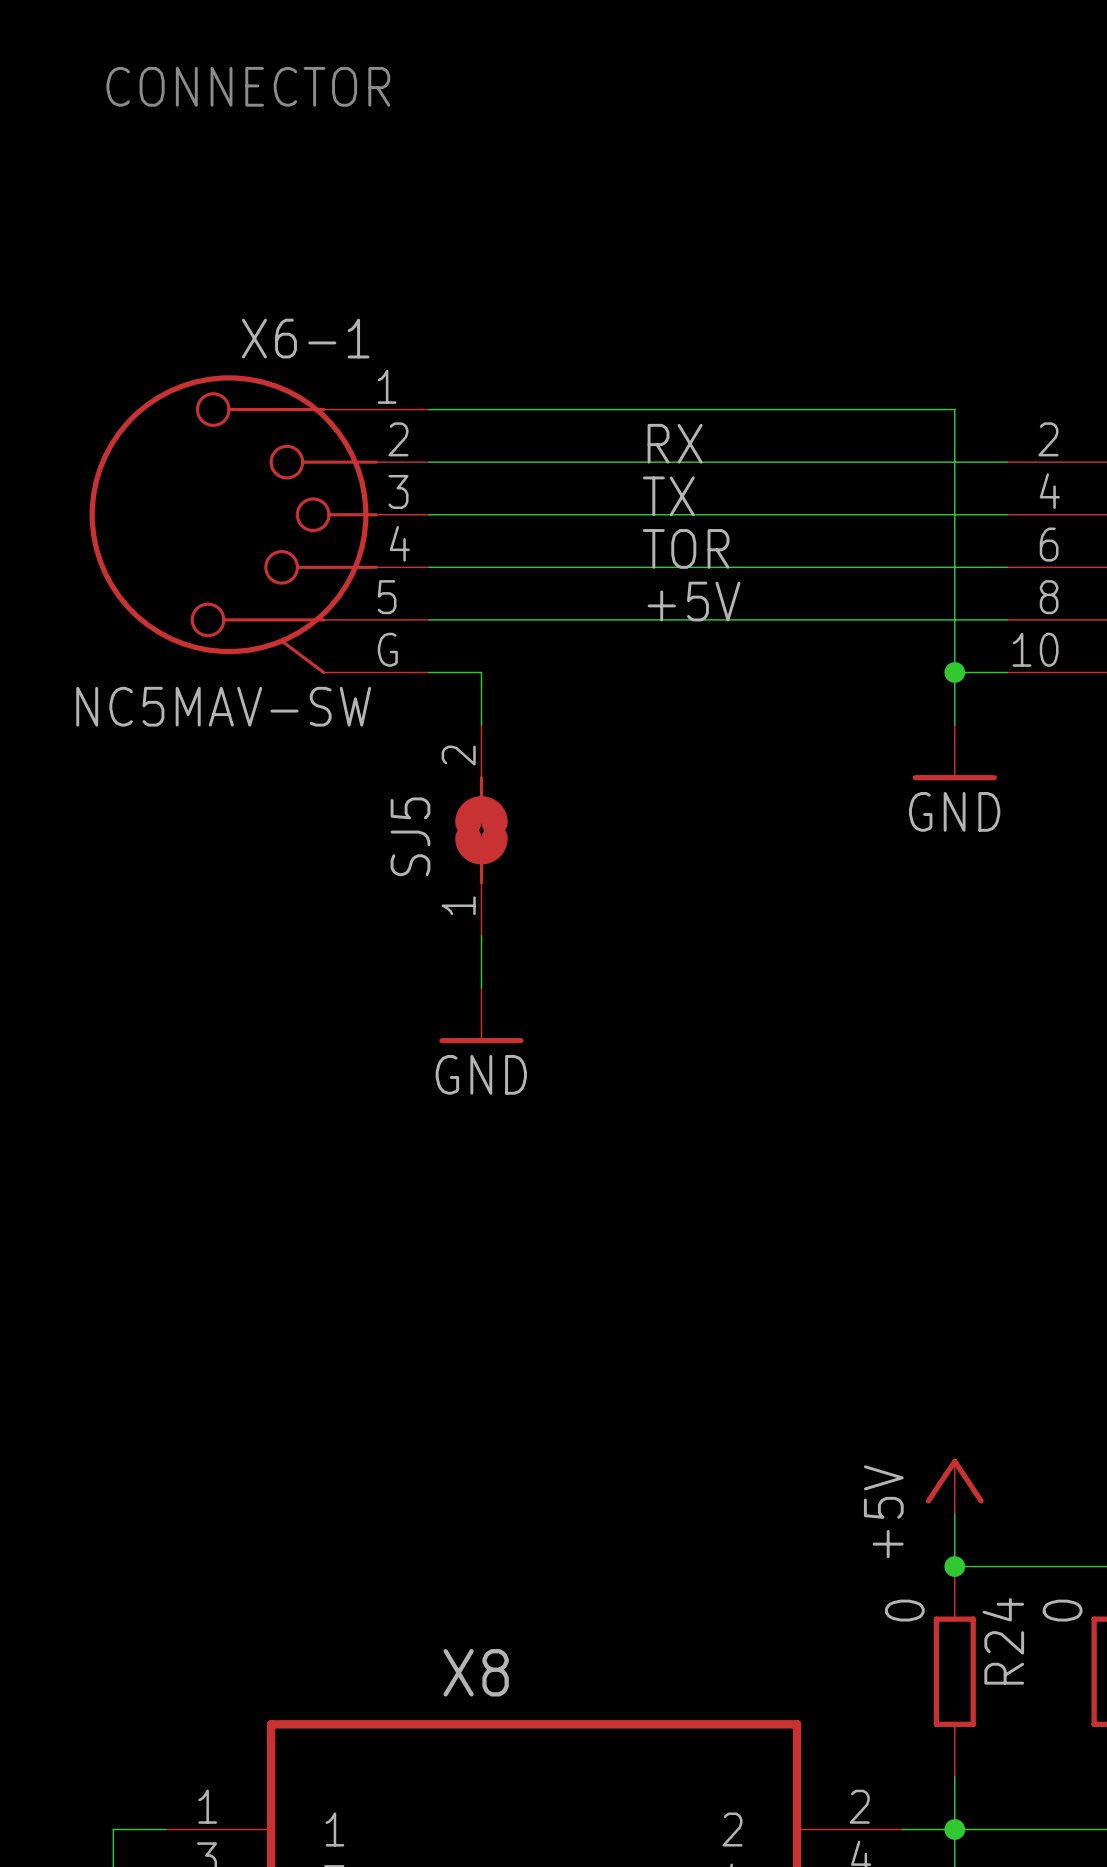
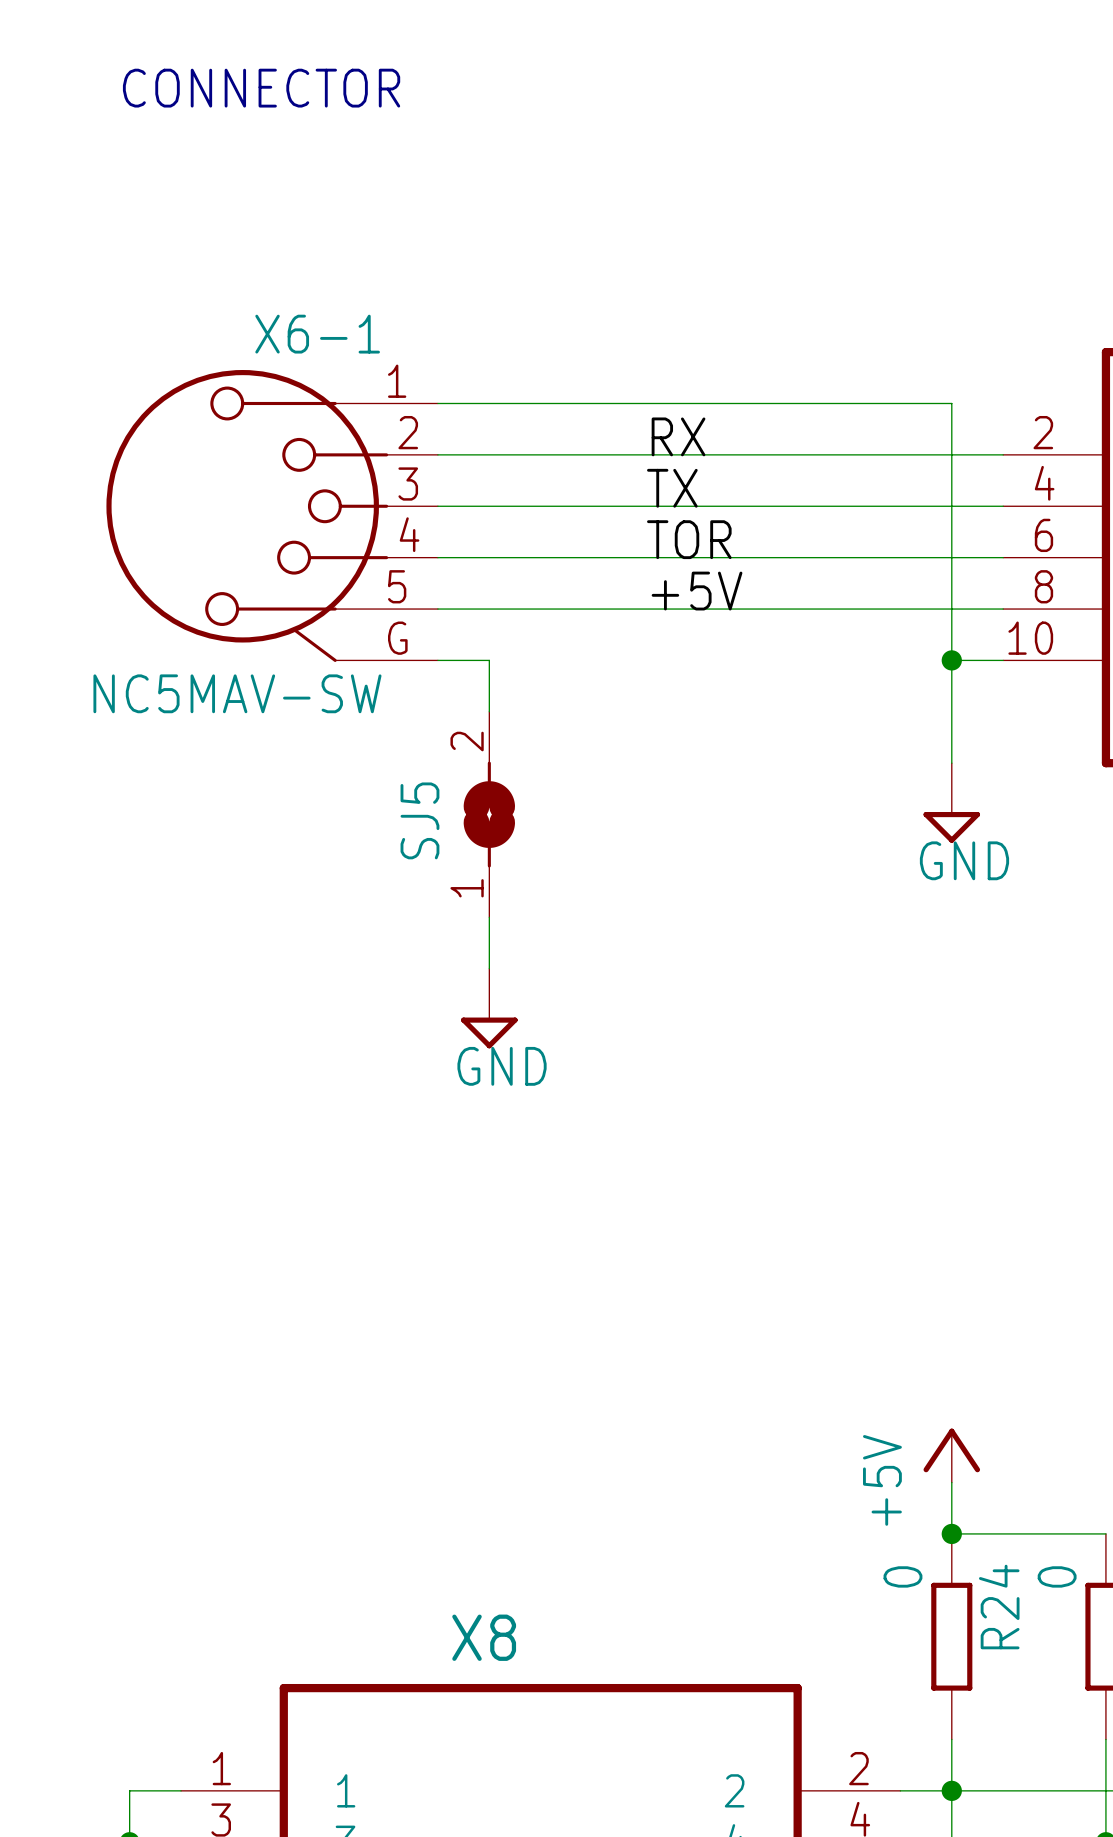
power symbol: GND (954, 752) -> none
power symbol: none -> GND (951, 803)
power symbol shape: [439, 988, 524, 1044] -> [461, 968, 518, 1049]

